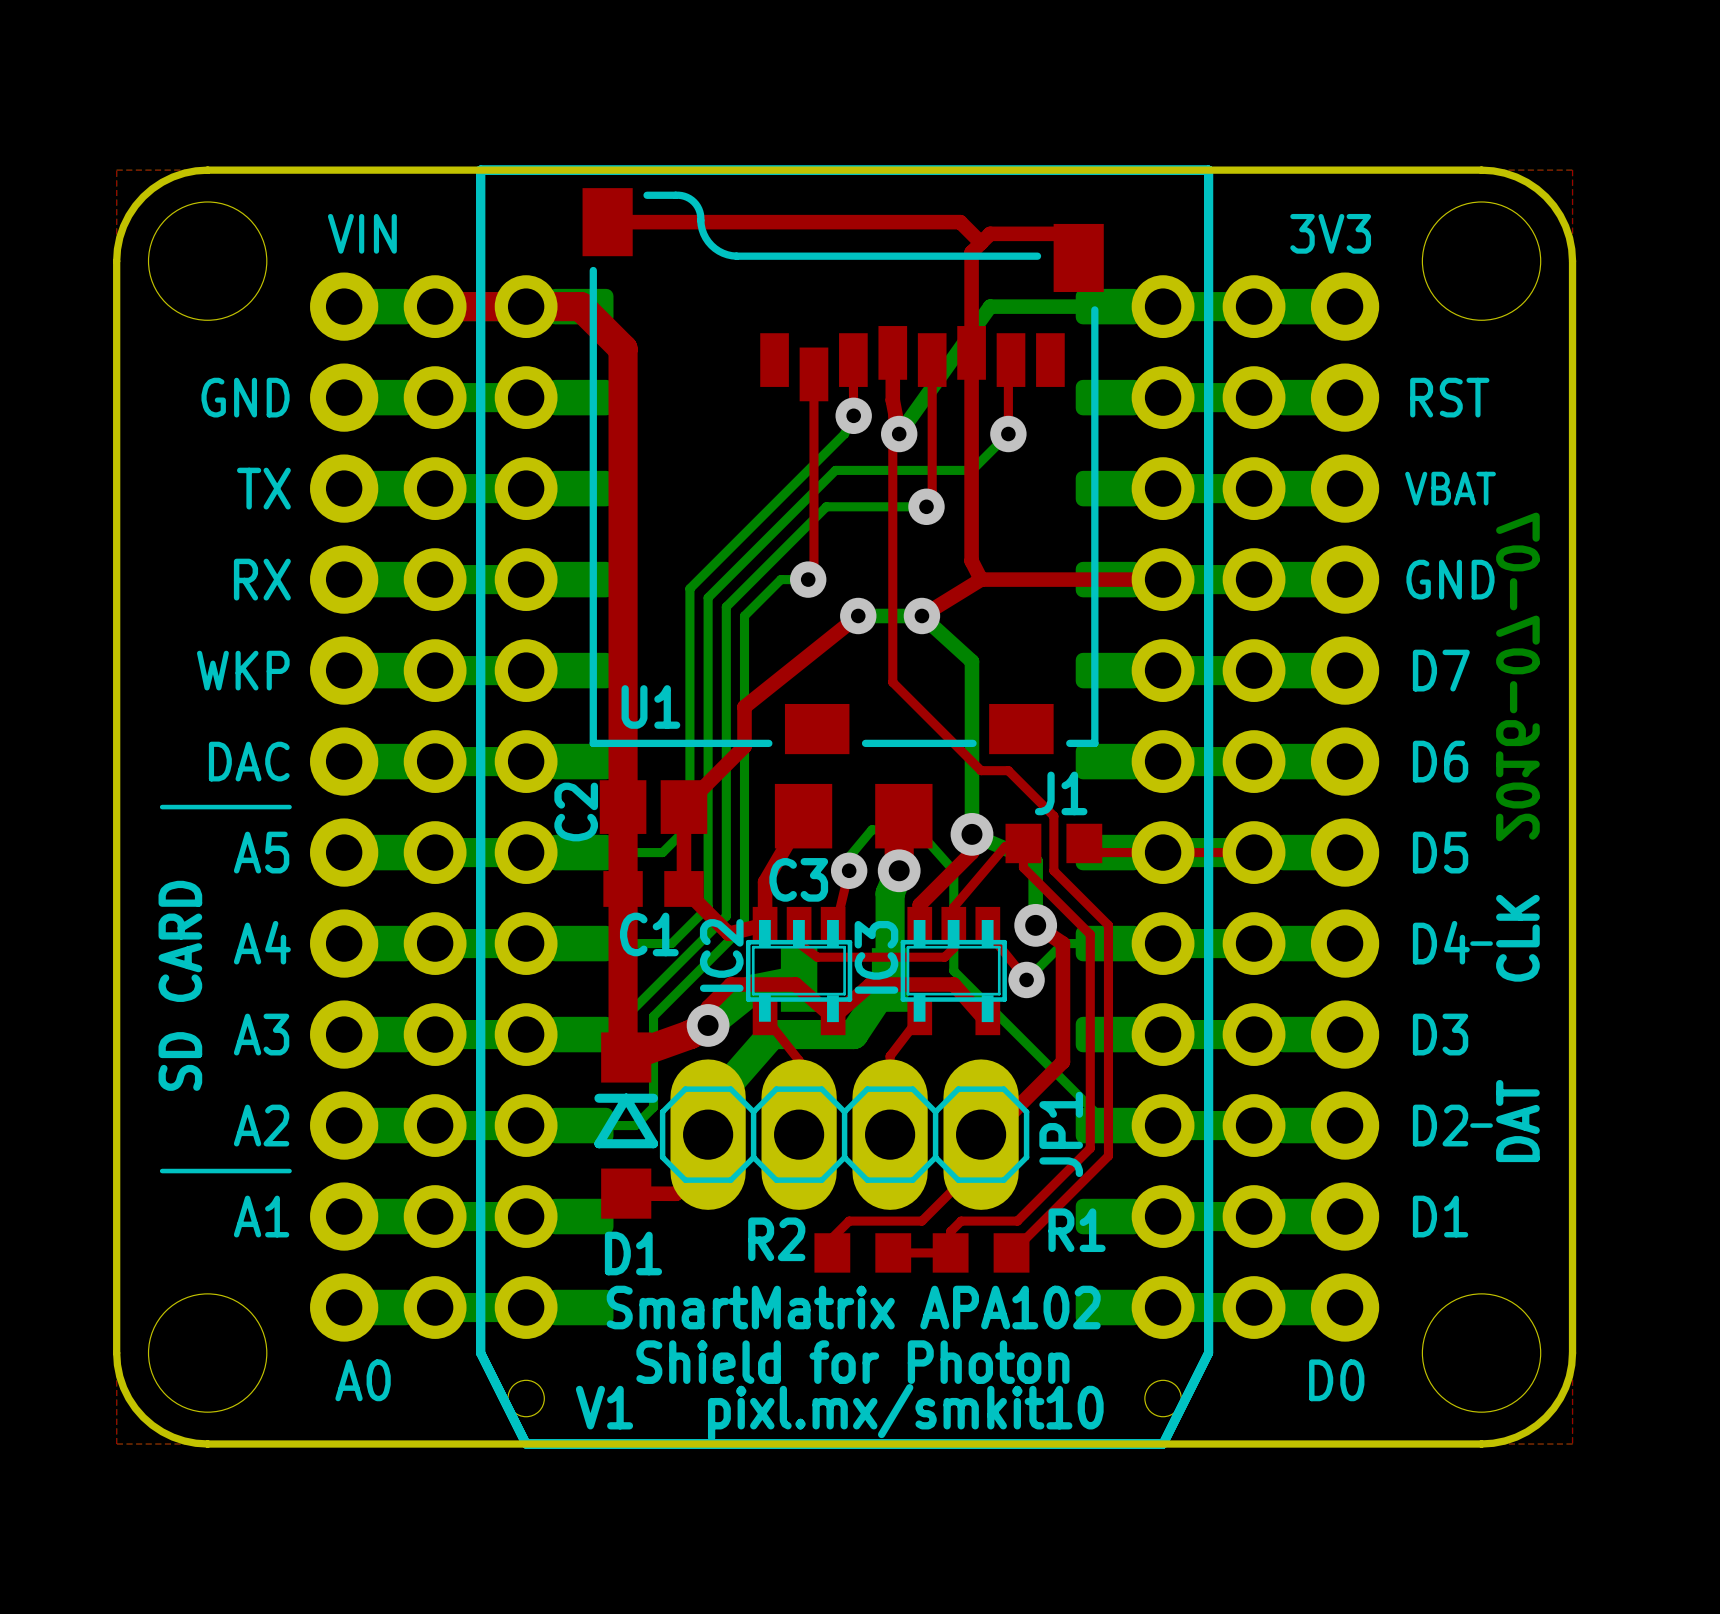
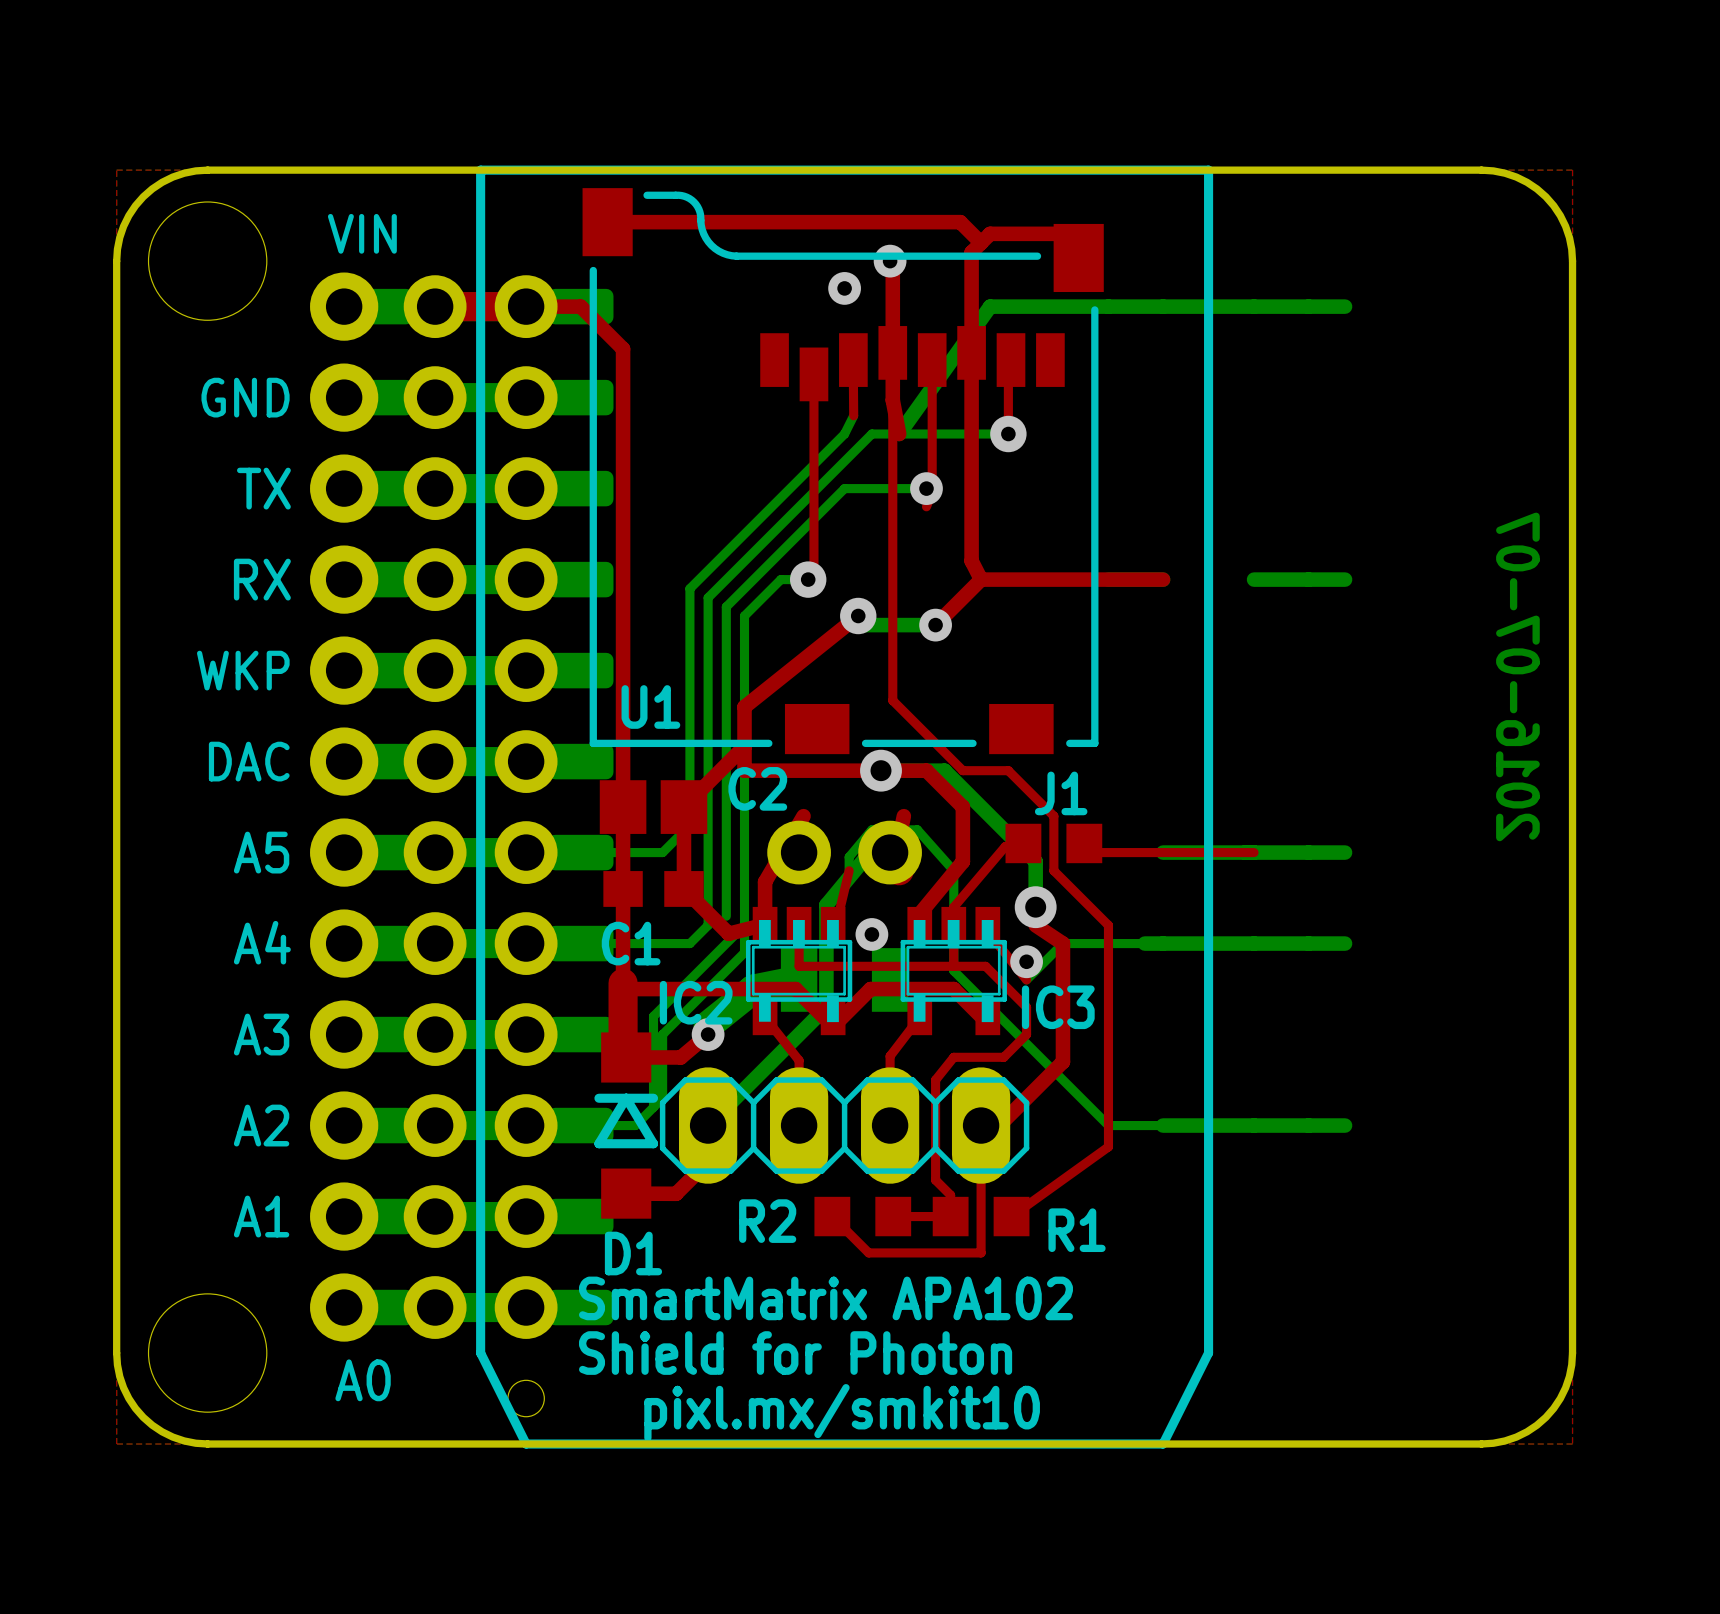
top track: none -> (890, 261) (892, 263) (892, 352)
via: none -> (890, 261)
via: none -> (844, 288)
top track width: thick (526, 306) (580, 306) (623, 348) (623, 983) -> thin (526, 306) (580, 306) (623, 348) (623, 983)
via: (853, 415) -> none
via: (899, 434) -> none
bottom track: (1008, 434) (971, 470) (835, 470) -> (1008, 434) (871, 434) (835, 470)
bottom track: (826, 506) (926, 506) -> (826, 506) (844, 488) (926, 488)
via position: (926, 506) -> (926, 488)
top track: (981, 579) (921, 615) -> (981, 579) (935, 625)
bottom track: none -> (1254, 579) (1345, 579)
bottom track: (858, 615) (921, 615) (971, 661) (971, 834) (1035, 861) -> (880, 770) (944, 770) (1035, 861)
via position: (921, 615) -> (935, 625)
bottom track: none -> (853, 625) (935, 625)
top track: (892, 682) (981, 770) -> (892, 682) (892, 700) (962, 770) (981, 770)
via: none -> (880, 770)
line: (162, 807) (289, 807) -> none
part: (1008, 807) -> none
C2 name rotation: 0° (576, 811) -> 90° clockwise (757, 788)
C2 name position: C2 (576, 811) -> C2 (757, 788)
C3: (853, 816) -> none
top track: (971, 834) (971, 852) (919, 904) (919, 913) -> (744, 746) (744, 770) (926, 770) (962, 807) (962, 861) (919, 913)
via: (971, 834) -> none
top track: (1023, 843) (1023, 867) (1090, 934) (1090, 1148) (1017, 1221) (961, 1221) (950, 1231) (950, 1252) -> none
part: none -> (844, 852)
bottom track: none -> (890, 852) (869, 852) (826, 905) (826, 1007) (708, 1125)
via: (849, 870) -> none
bottom track: (899, 870) (890, 893) (890, 979) (853, 1034) (771, 1034) (708, 1107) (708, 1134) -> none
via: (899, 870) -> none
bottom track: (708, 907) (671, 943) -> (708, 907) (708, 925) (689, 943) (671, 943)
bottom track: (726, 916) (608, 1034) -> none
bottom track: none -> (744, 925) (744, 952) (662, 1034) (662, 1098) (653, 1107)
via position: (1035, 925) -> (1035, 907)
C1 name position: C1 (649, 934) -> C1 (631, 943)
via: none -> (871, 934)
text: CLK (1517, 938) -> none
top track: (799, 943) (817, 957) (944, 957) (953, 948) -> (953, 966) (953, 948)
top track: none -> (799, 943) (799, 966) (985, 966) (1026, 1007) (1026, 1034) (1003, 1057) (953, 1057) (935, 1080) (935, 1180) (950, 1195) (950, 1216) (893, 1216)
line: (1472, 943) (1490, 943) -> none
text rotation: 0° (721, 955) -> 90° clockwise (696, 1002)
text rotation: 0° (876, 957) -> 90° clockwise (1058, 1007)
text position: IC3 (876, 957) -> IC3 (1058, 1007)
via position: (1026, 979) -> (1026, 961)
text: SD CARD (180, 985) -> none
top track: none -> (626, 989) (795, 989) (833, 1026) (870, 989) (953, 989) (987, 1023) (987, 1026)
via size: [686, 1004, 730, 1047] -> [691, 1018, 725, 1051]
top track: (987, 1017) (987, 1023) (953, 984) (870, 984) (833, 1017) (795, 984) (730, 984) (708, 1007) (708, 1025) (689, 1034) (626, 1057) -> (708, 1034) (680, 1057) (626, 1057)
text: DAT (1517, 1121) -> none
part: none -> (844, 1125)
line: (1472, 1125) (1490, 1125) -> none
JP1: (844, 1134) -> none
top track: (1108, 1146) (1108, 1156) (1011, 1252) -> (1108, 1146) (1011, 1216)
top track: (981, 1161) (921, 1221) (849, 1221) (832, 1237) (832, 1252) -> (981, 1161) (981, 1252) (950, 1252)
line: (162, 1171) (289, 1171) -> none
top track: none -> (832, 1216) (868, 1252) (893, 1252)
R2 name position: R2 (776, 1239) -> R2 (767, 1221)
R2 position: (862, 1252) -> (862, 1216)
R1 position: (981, 1252) -> (981, 1216)
text position: SmartMatrix APA102 (853, 1307) -> SmartMatrix APA102 (825, 1298)
text position: Shield for Photon (852, 1362) -> Shield for Photon (795, 1353)
text: V1 (604, 1407) -> none
text position: pixl.mx/smkit10 (905, 1412) -> pixl.mx/smkit10 (842, 1412)

